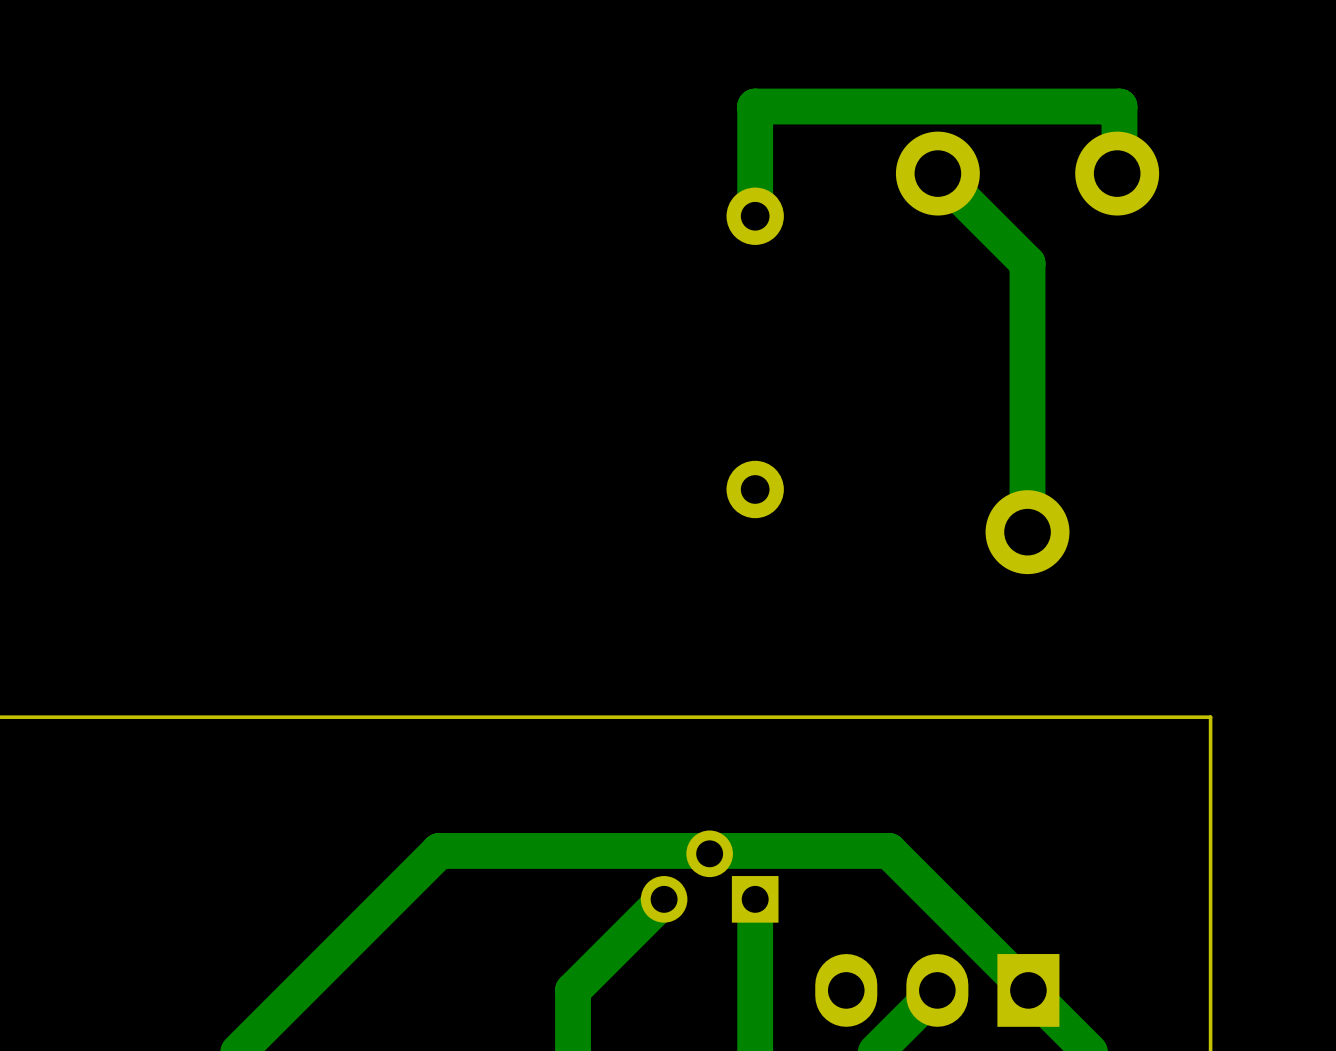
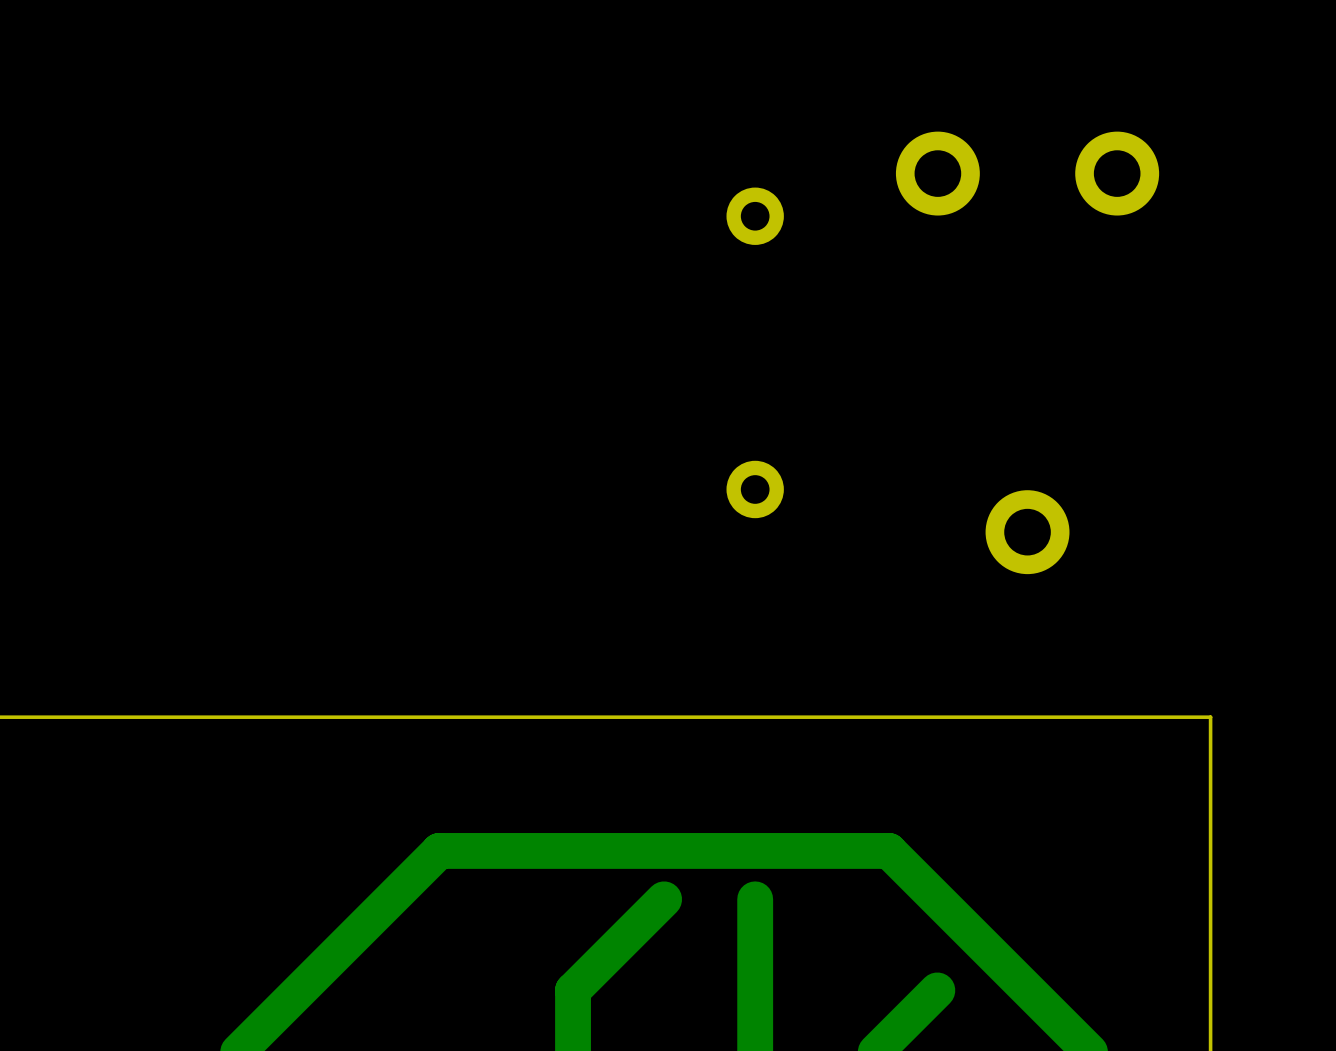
track: (937, 173) (1027, 263) (1027, 532) -> none
track: (1117, 173) (1119, 171) (1119, 106) (755, 106) (755, 216) -> none
part: (709, 876) -> none
part: (937, 990) -> none

